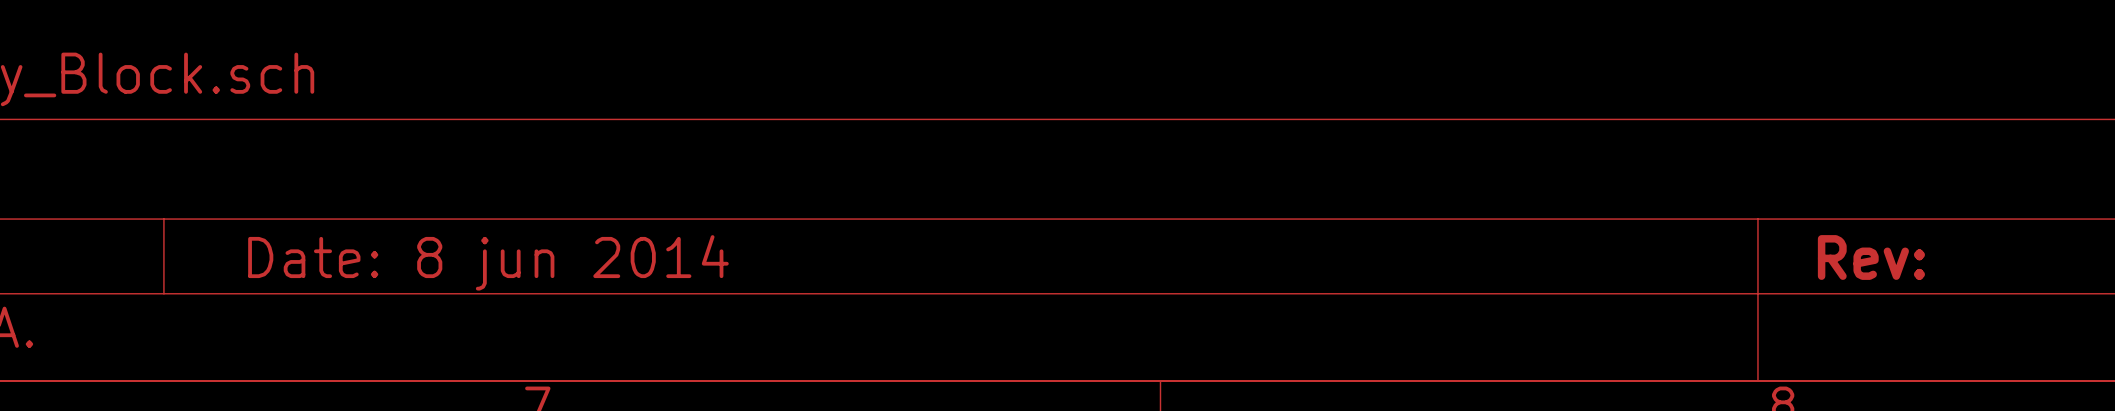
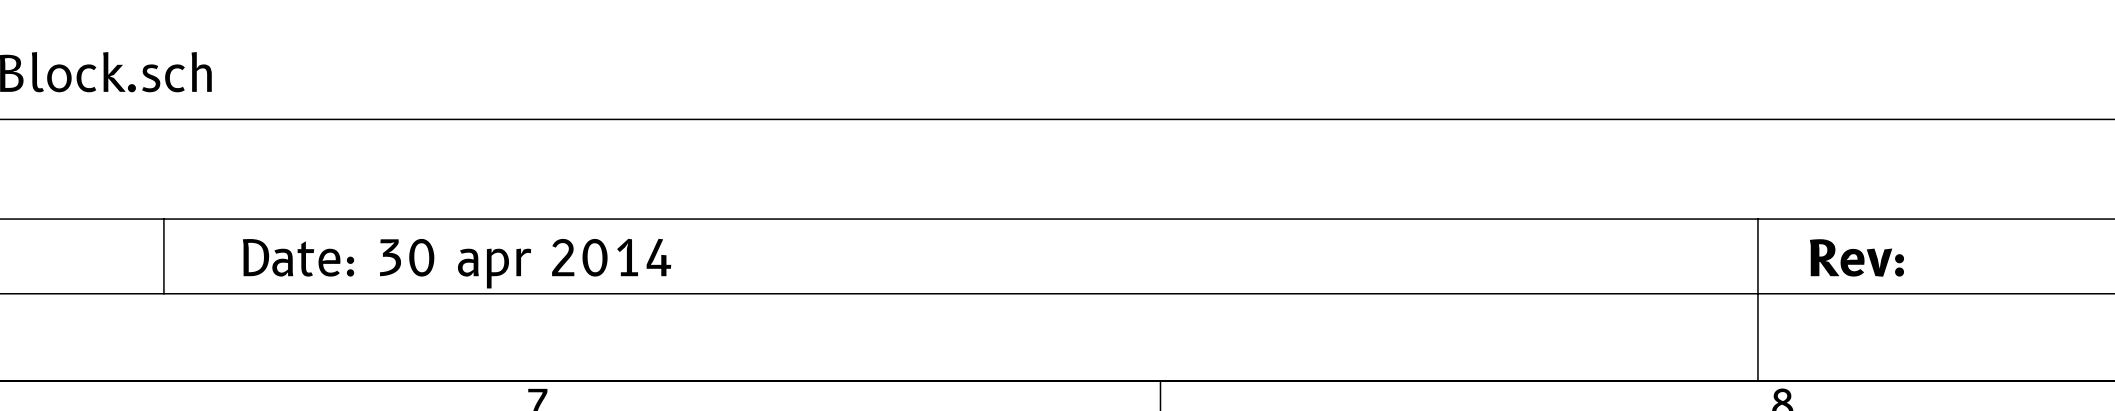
title block: Date: 8 jun 2014 (488, 262) -> Date: 30 apr 2014 (457, 263)

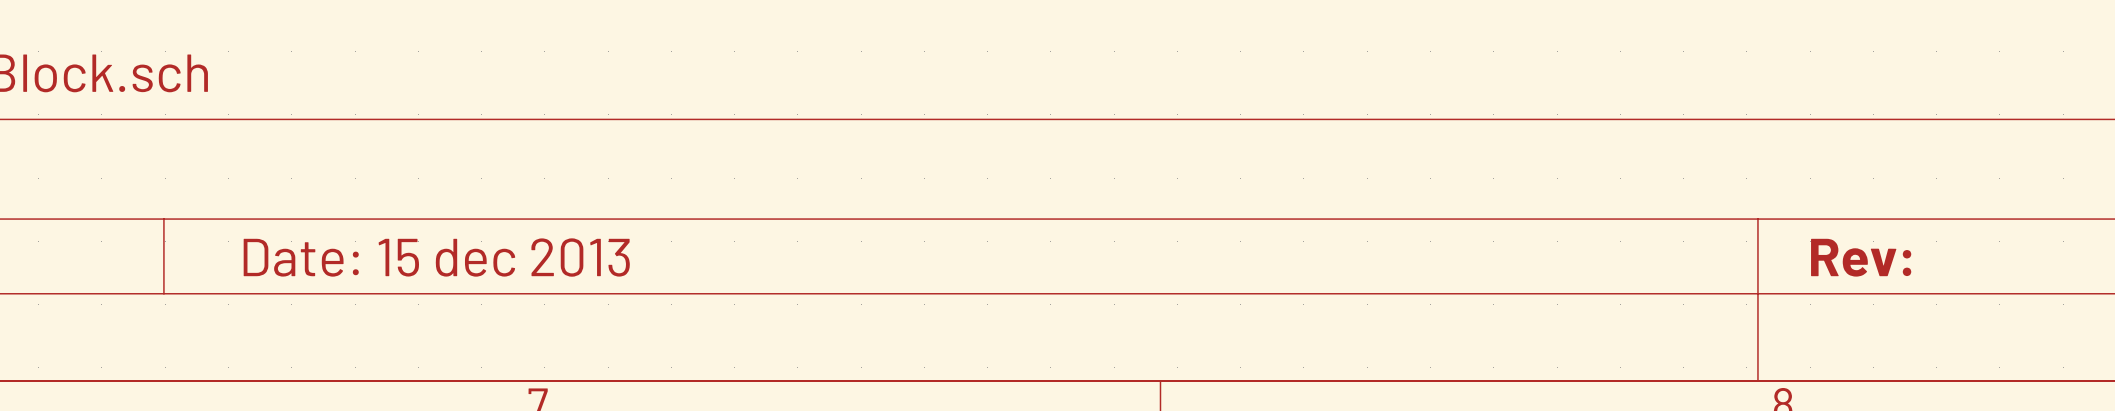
title block: Date: 30 apr 2014 (457, 263) -> Date: 15 dec 2013 (436, 257)

